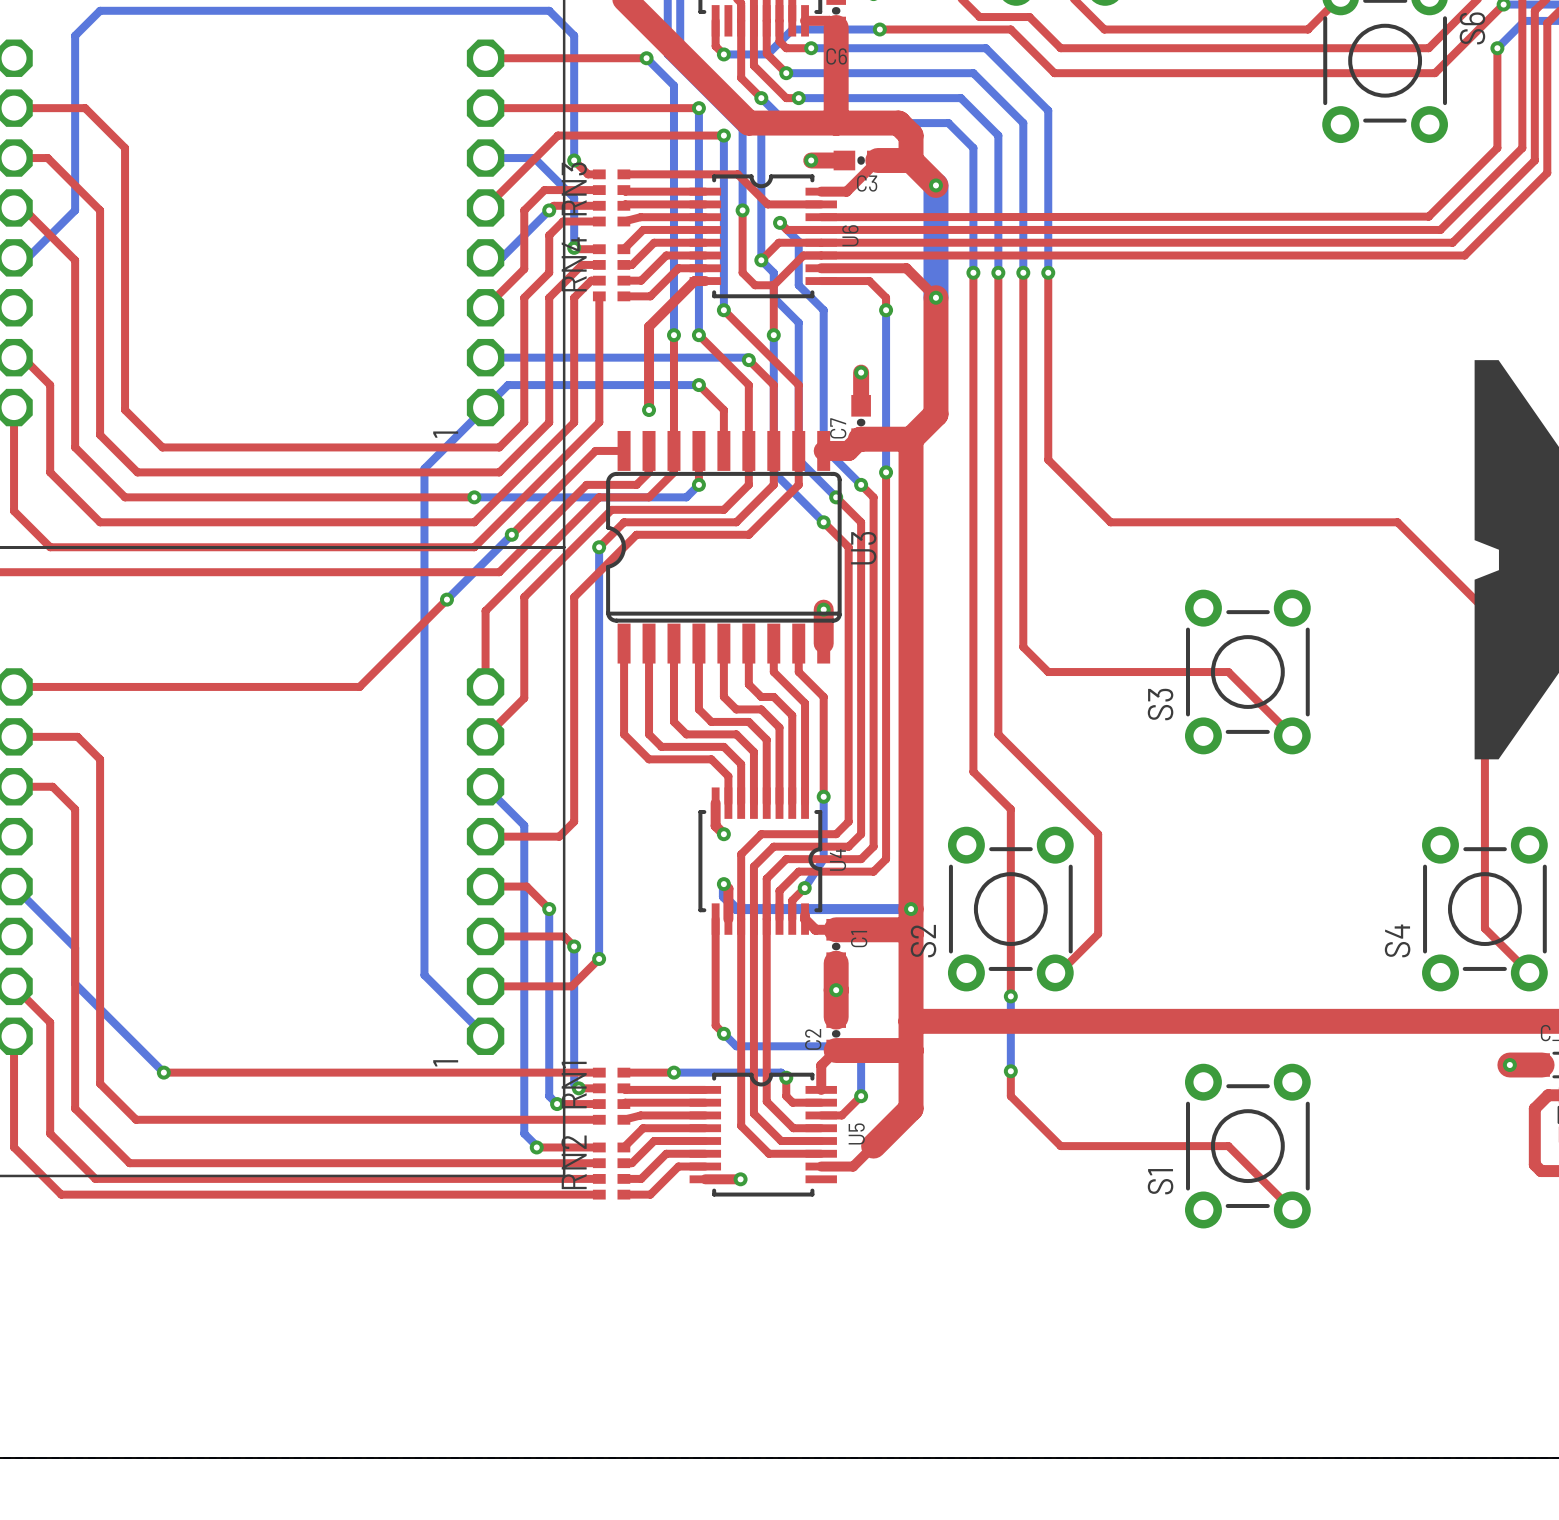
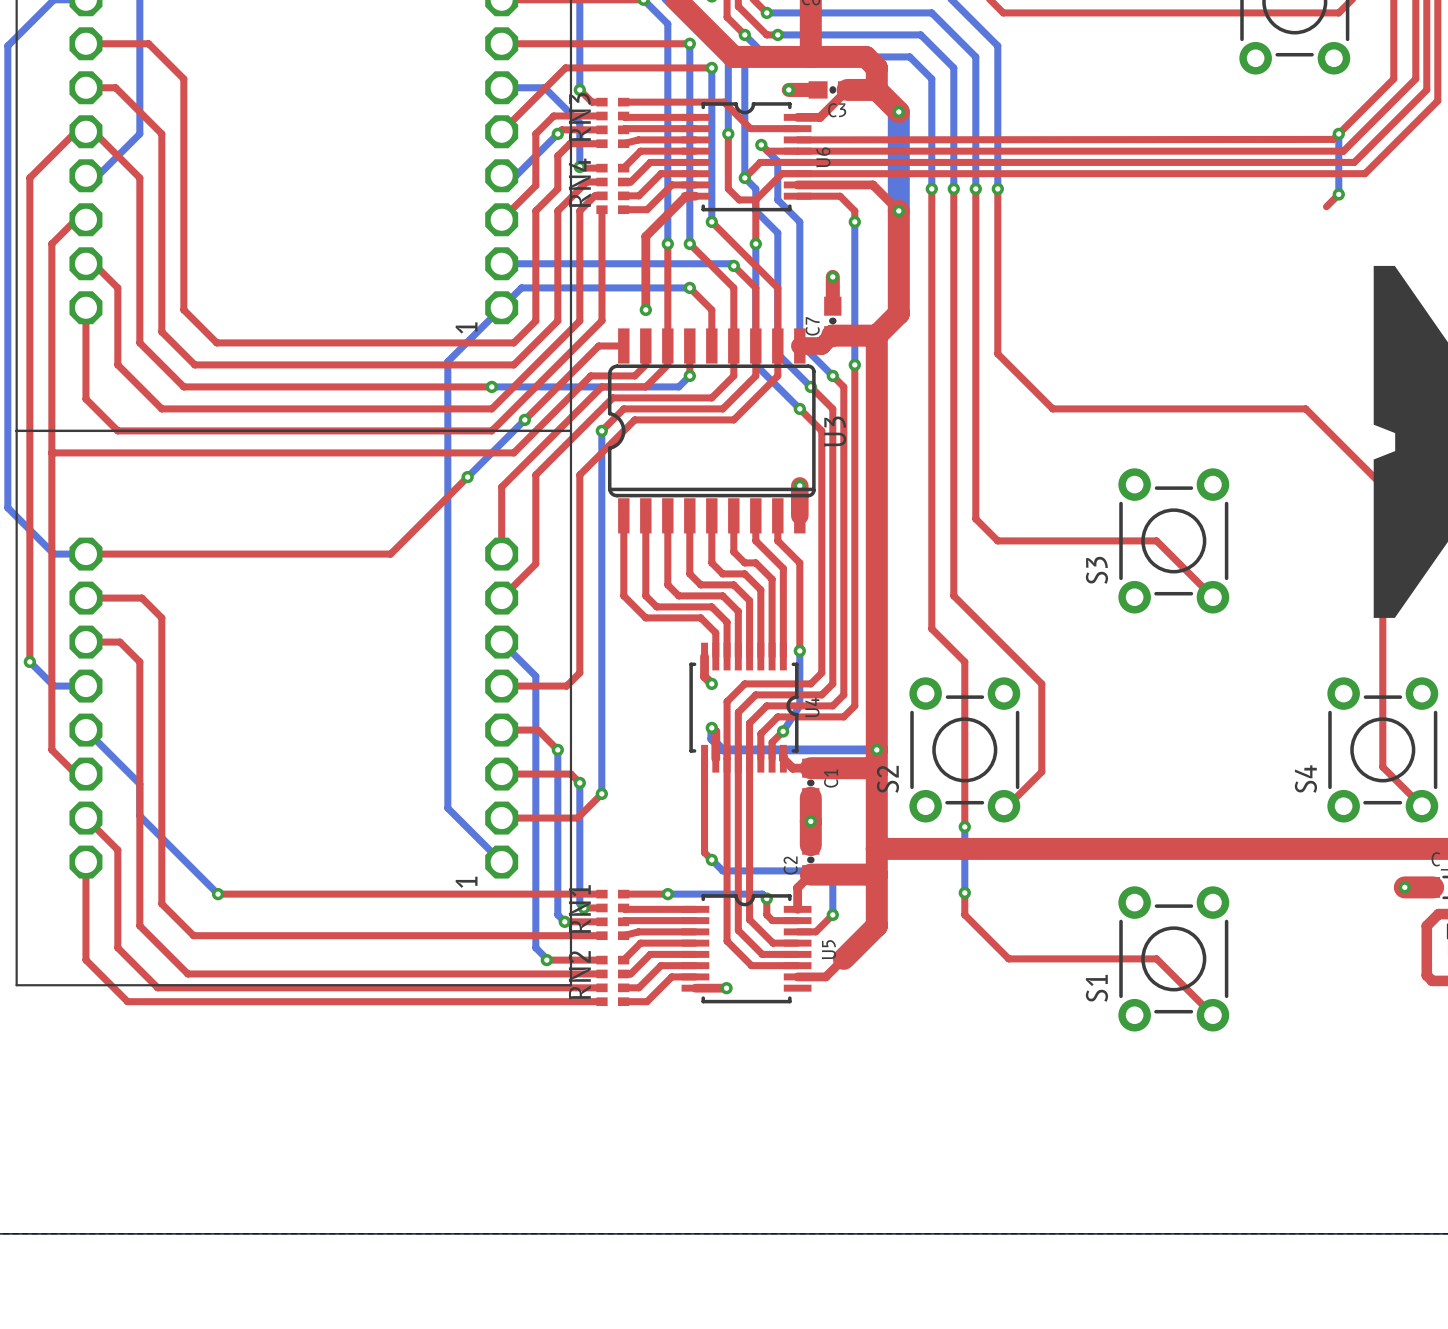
bottom track: none -> (1338, 133) (1338, 194)
via: none -> (1338, 133)
top track: none -> (1338, 194) (1326, 206)
via: none -> (1338, 194)

